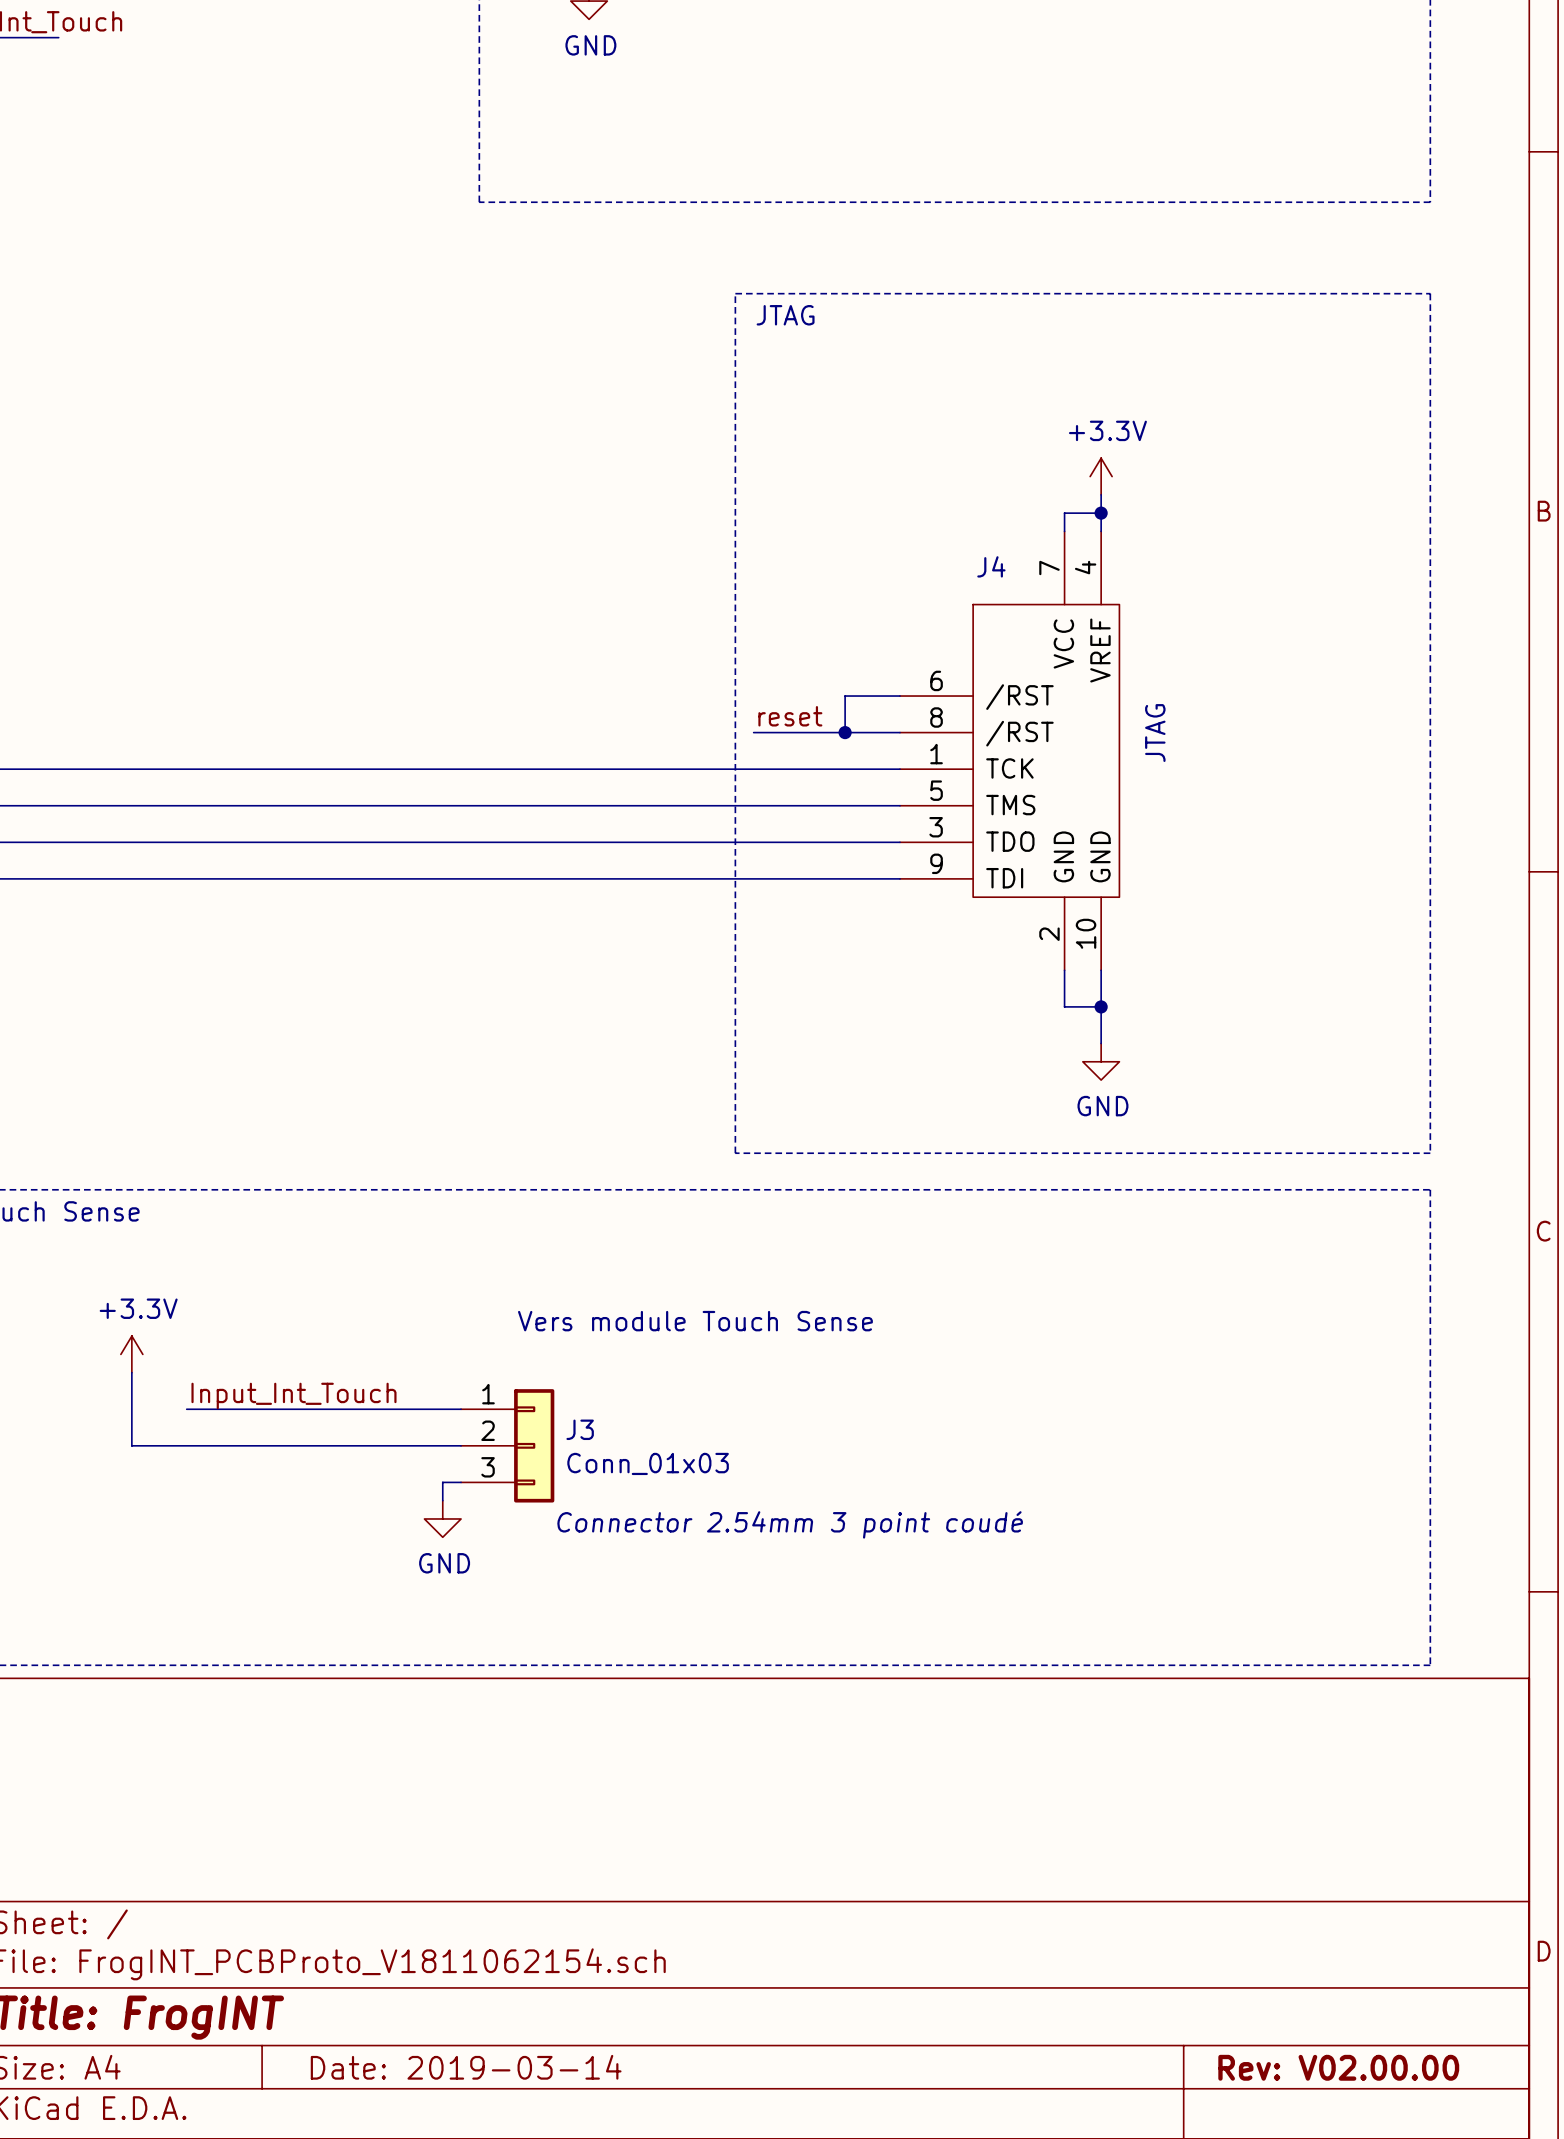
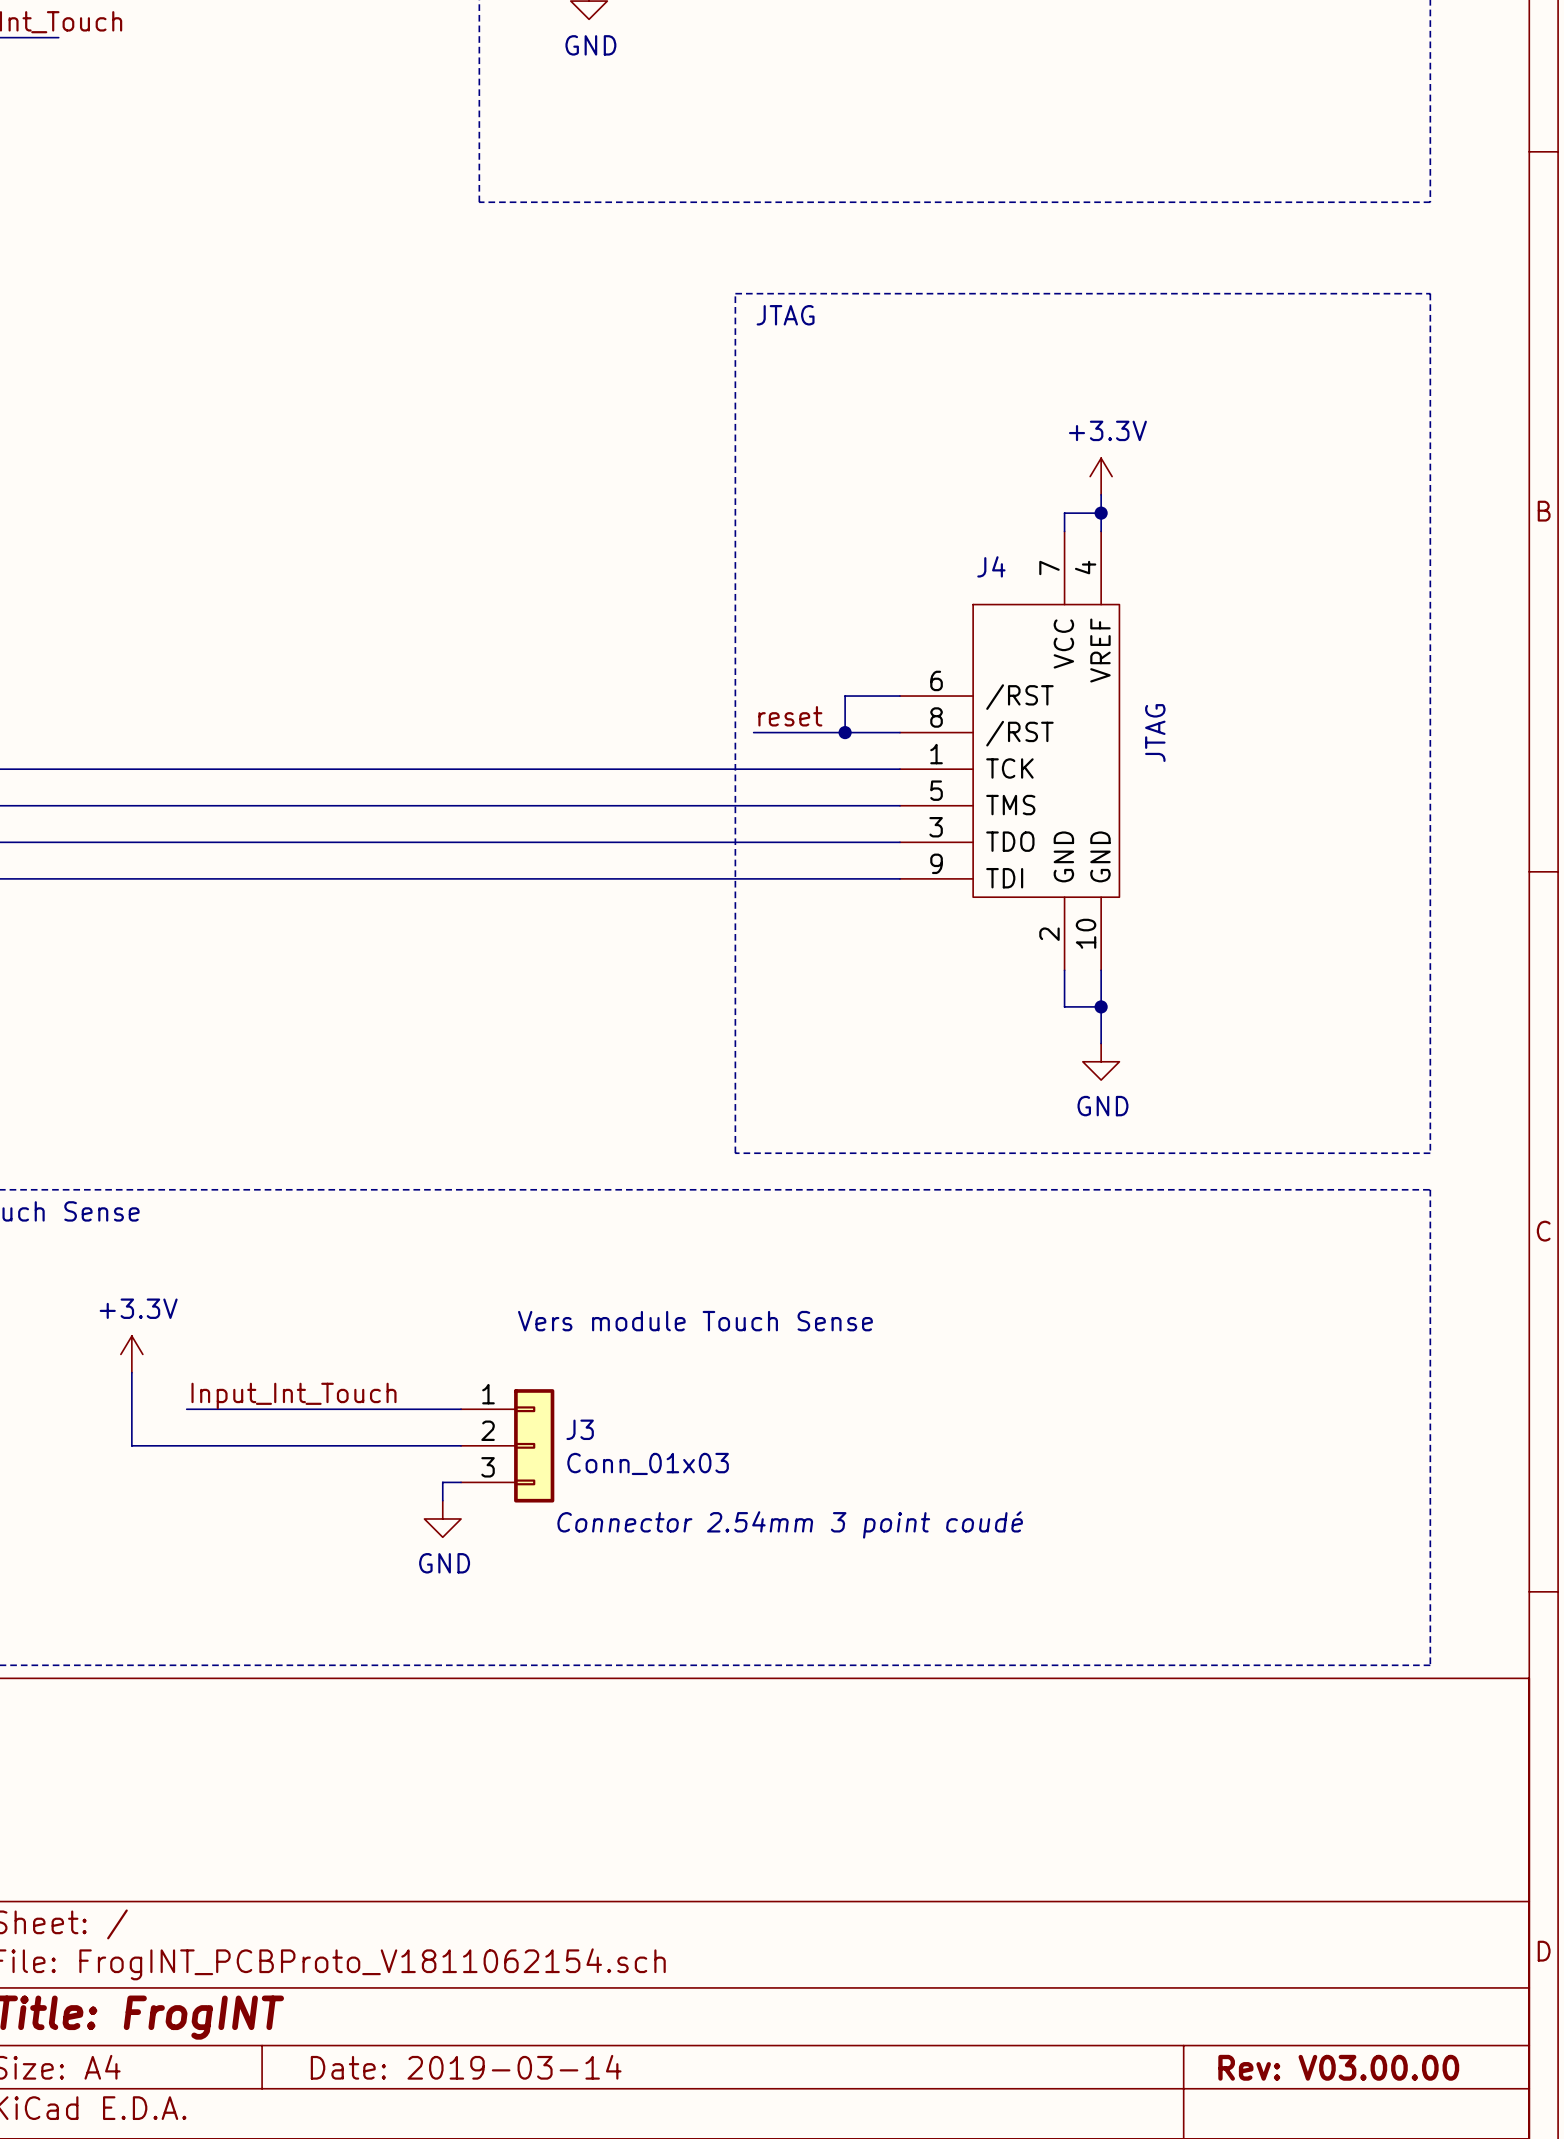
title block: Rev: V02.00.00 (1338, 2067) -> Rev: V03.00.00 (1338, 2067)

